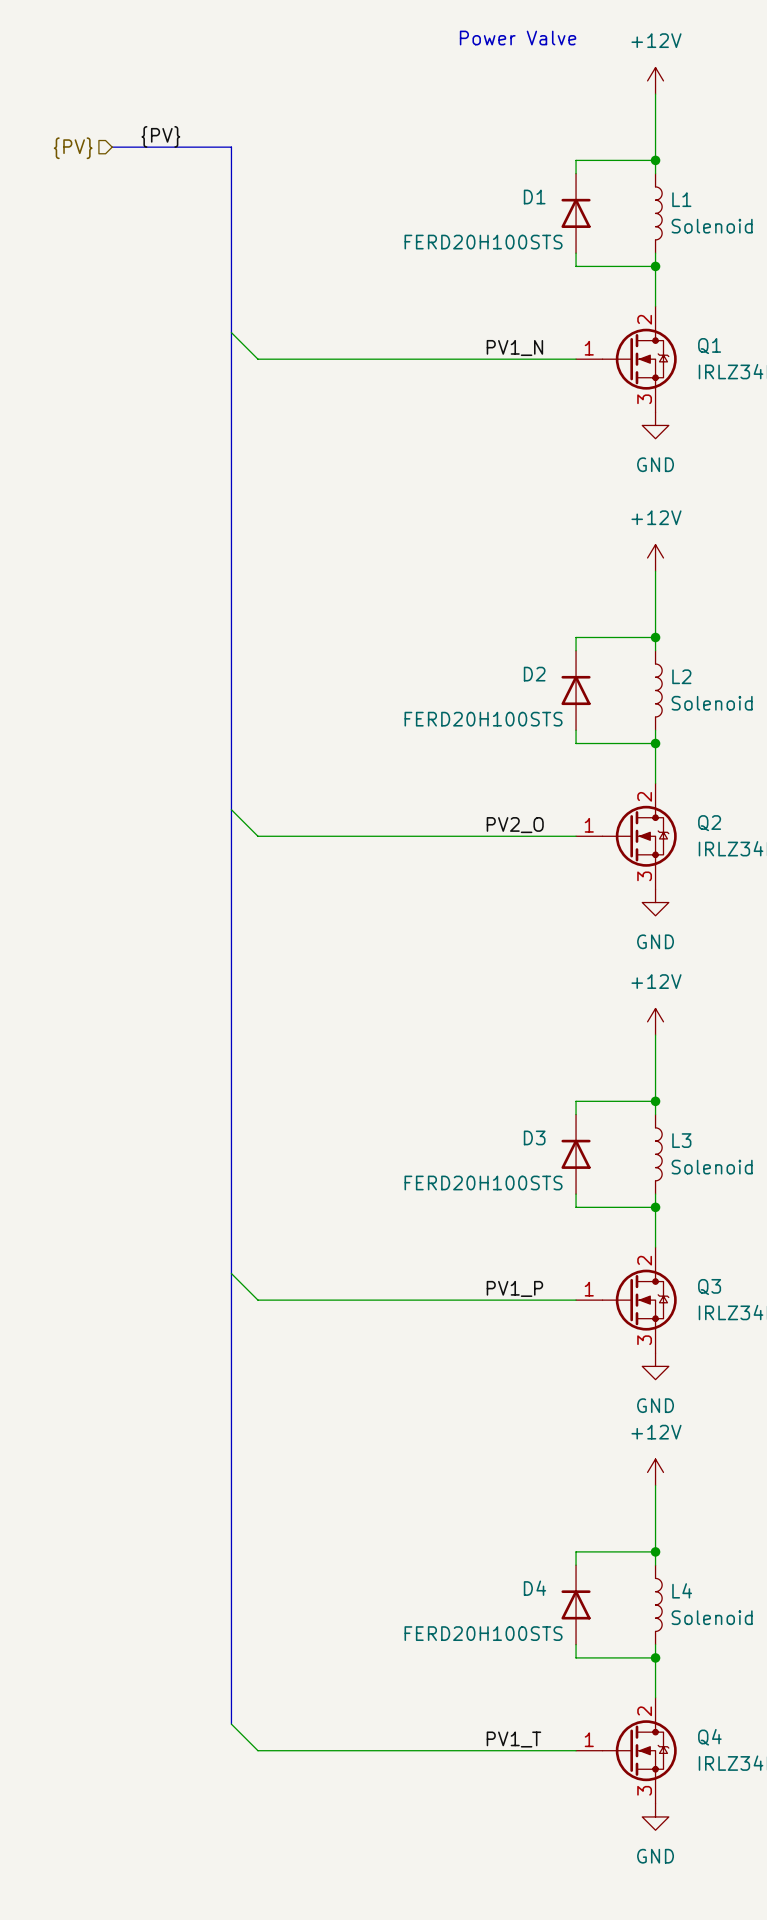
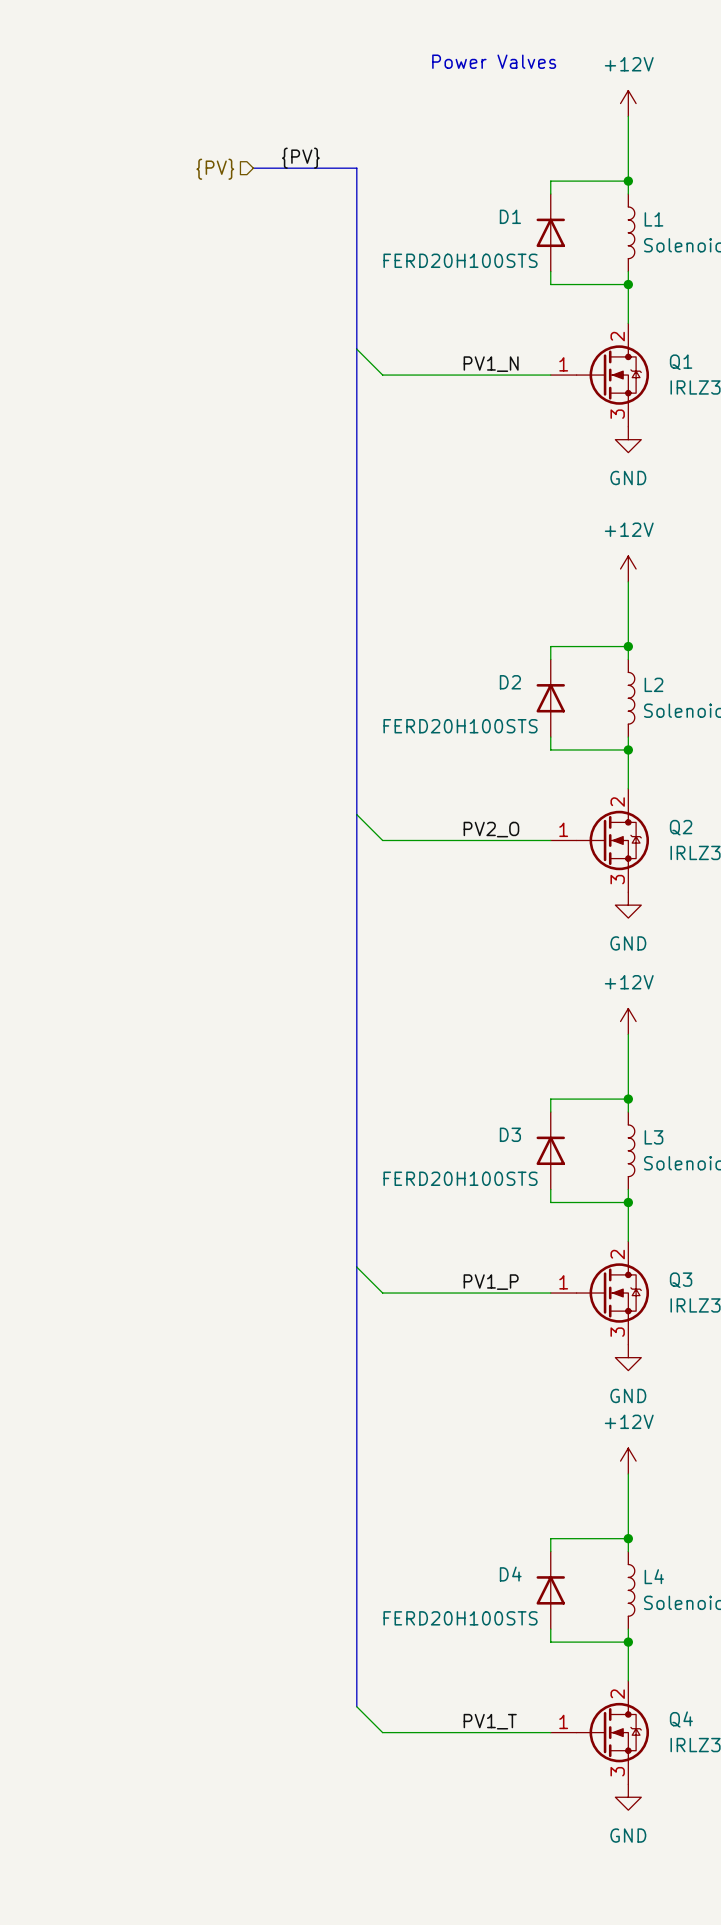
text: Power Valve (518, 38) -> Power Valves (494, 61)
label position: {PV} (160, 136) -> {PV} (300, 158)
bus: (112, 147) (231, 147) (231, 1724) -> none
bus: none -> (253, 168) (356, 168) (356, 1706)
hierarchical label position: {PV} (73, 148) -> {PV} (215, 169)
wire: (231, 332) (257, 359) (403, 359) -> (356, 349) (382, 375)
wire: (231, 809) (257, 836) (403, 836) -> (356, 814) (382, 840)
wire: (231, 1273) (257, 1300) (403, 1300) -> (356, 1267) (382, 1293)
wire: (231, 1724) (257, 1750) (403, 1750) -> (356, 1706) (382, 1732)

